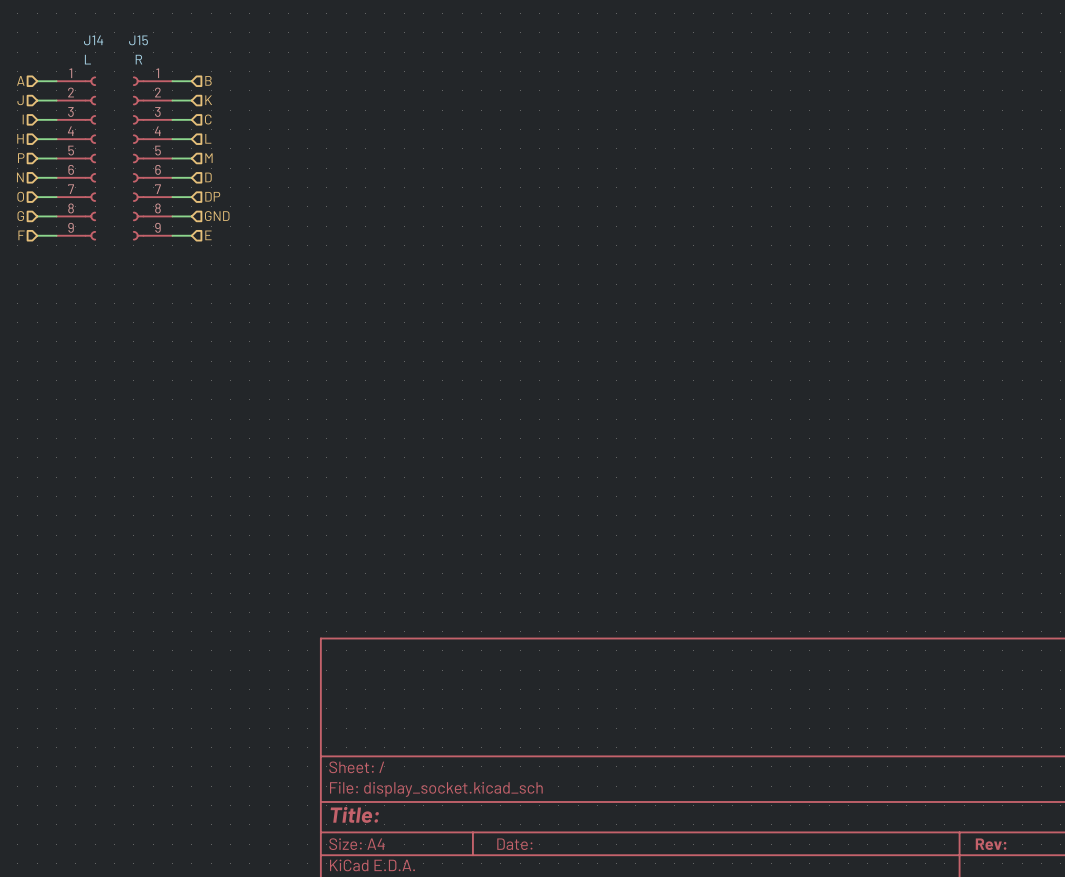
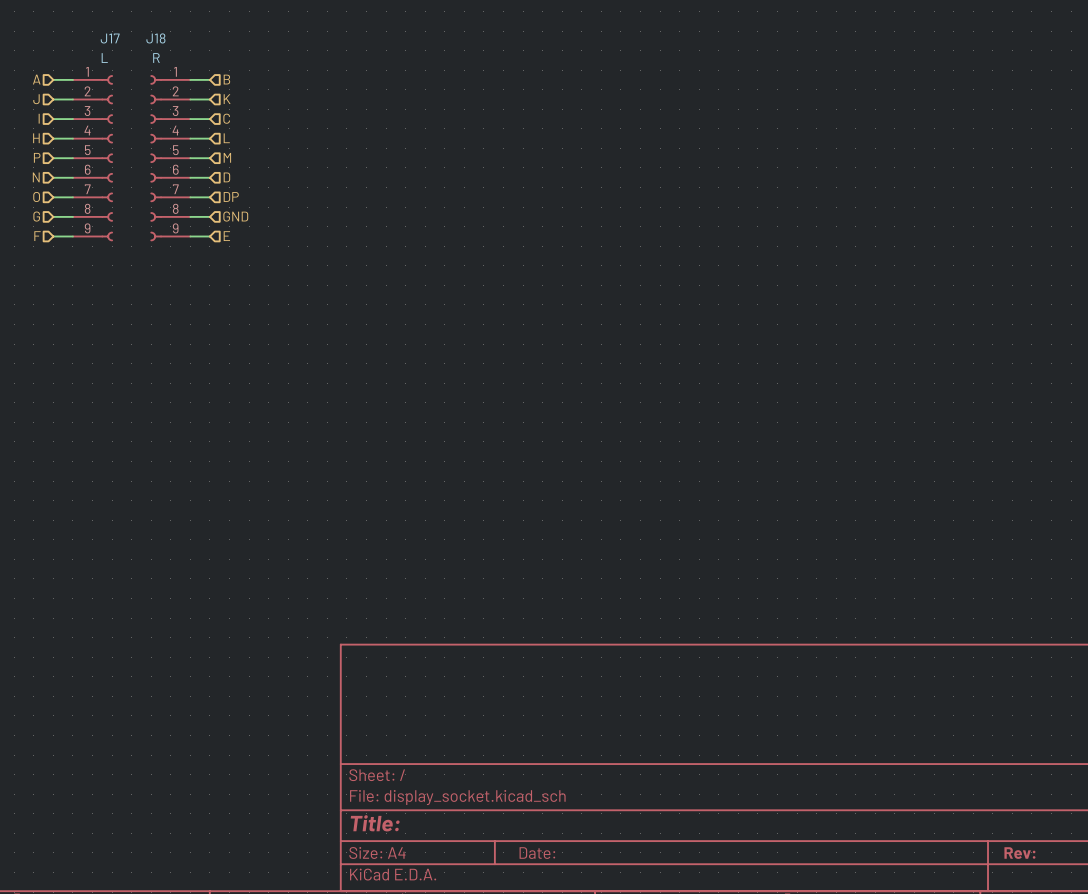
J14 name: J14 (93, 40) -> J17 (110, 38)
J15 name: J15 (138, 40) -> J18 (155, 38)

